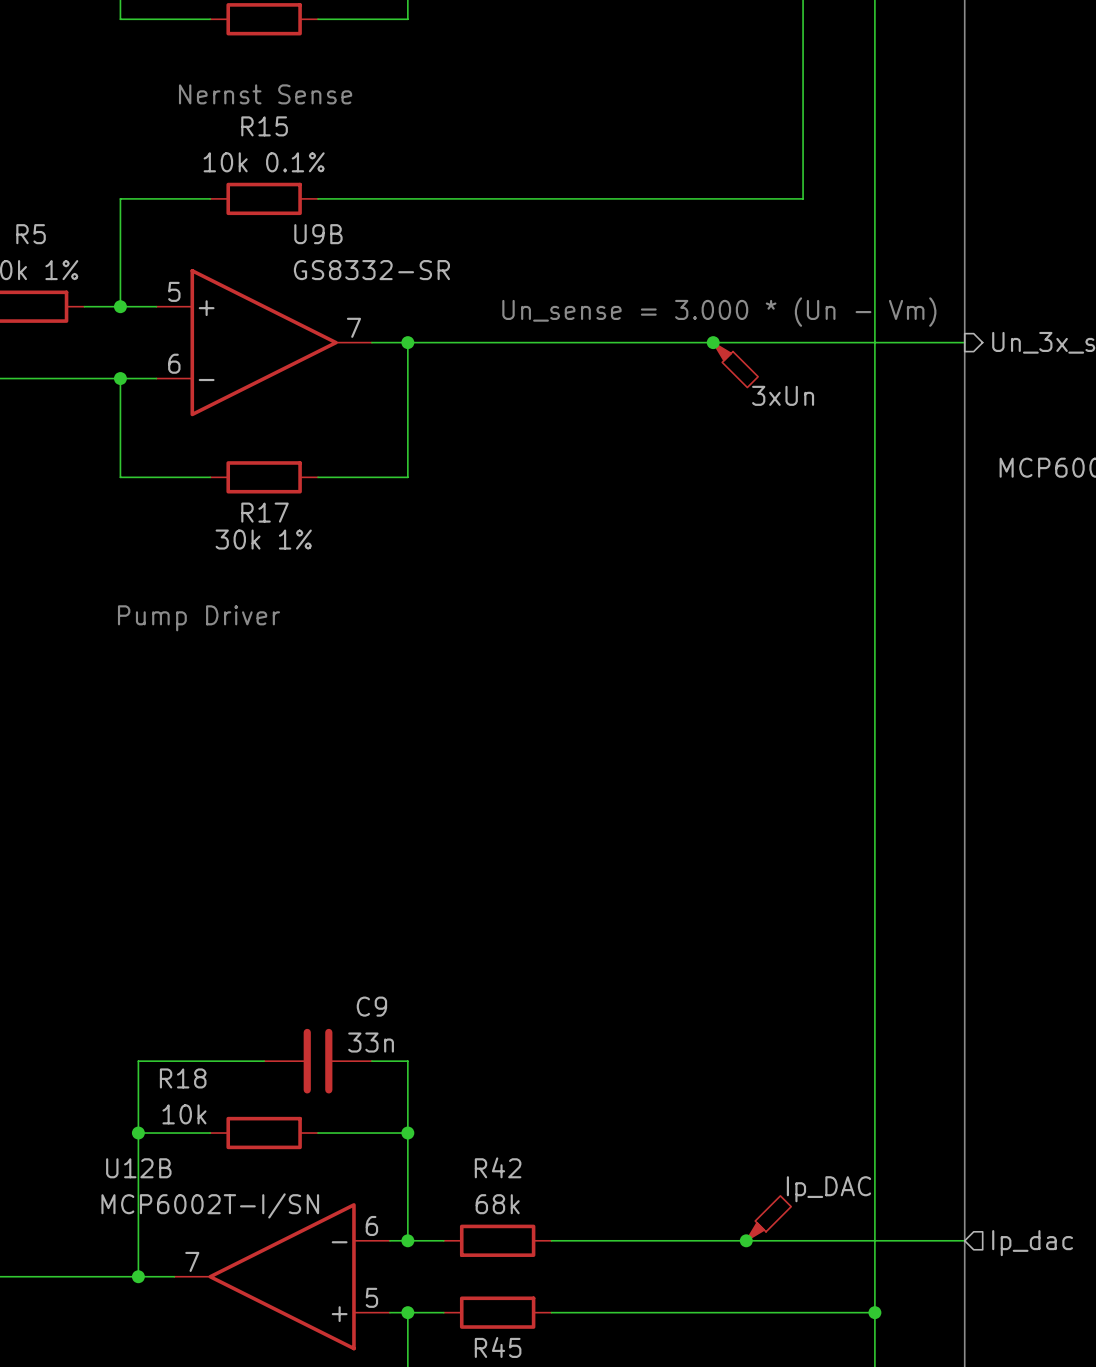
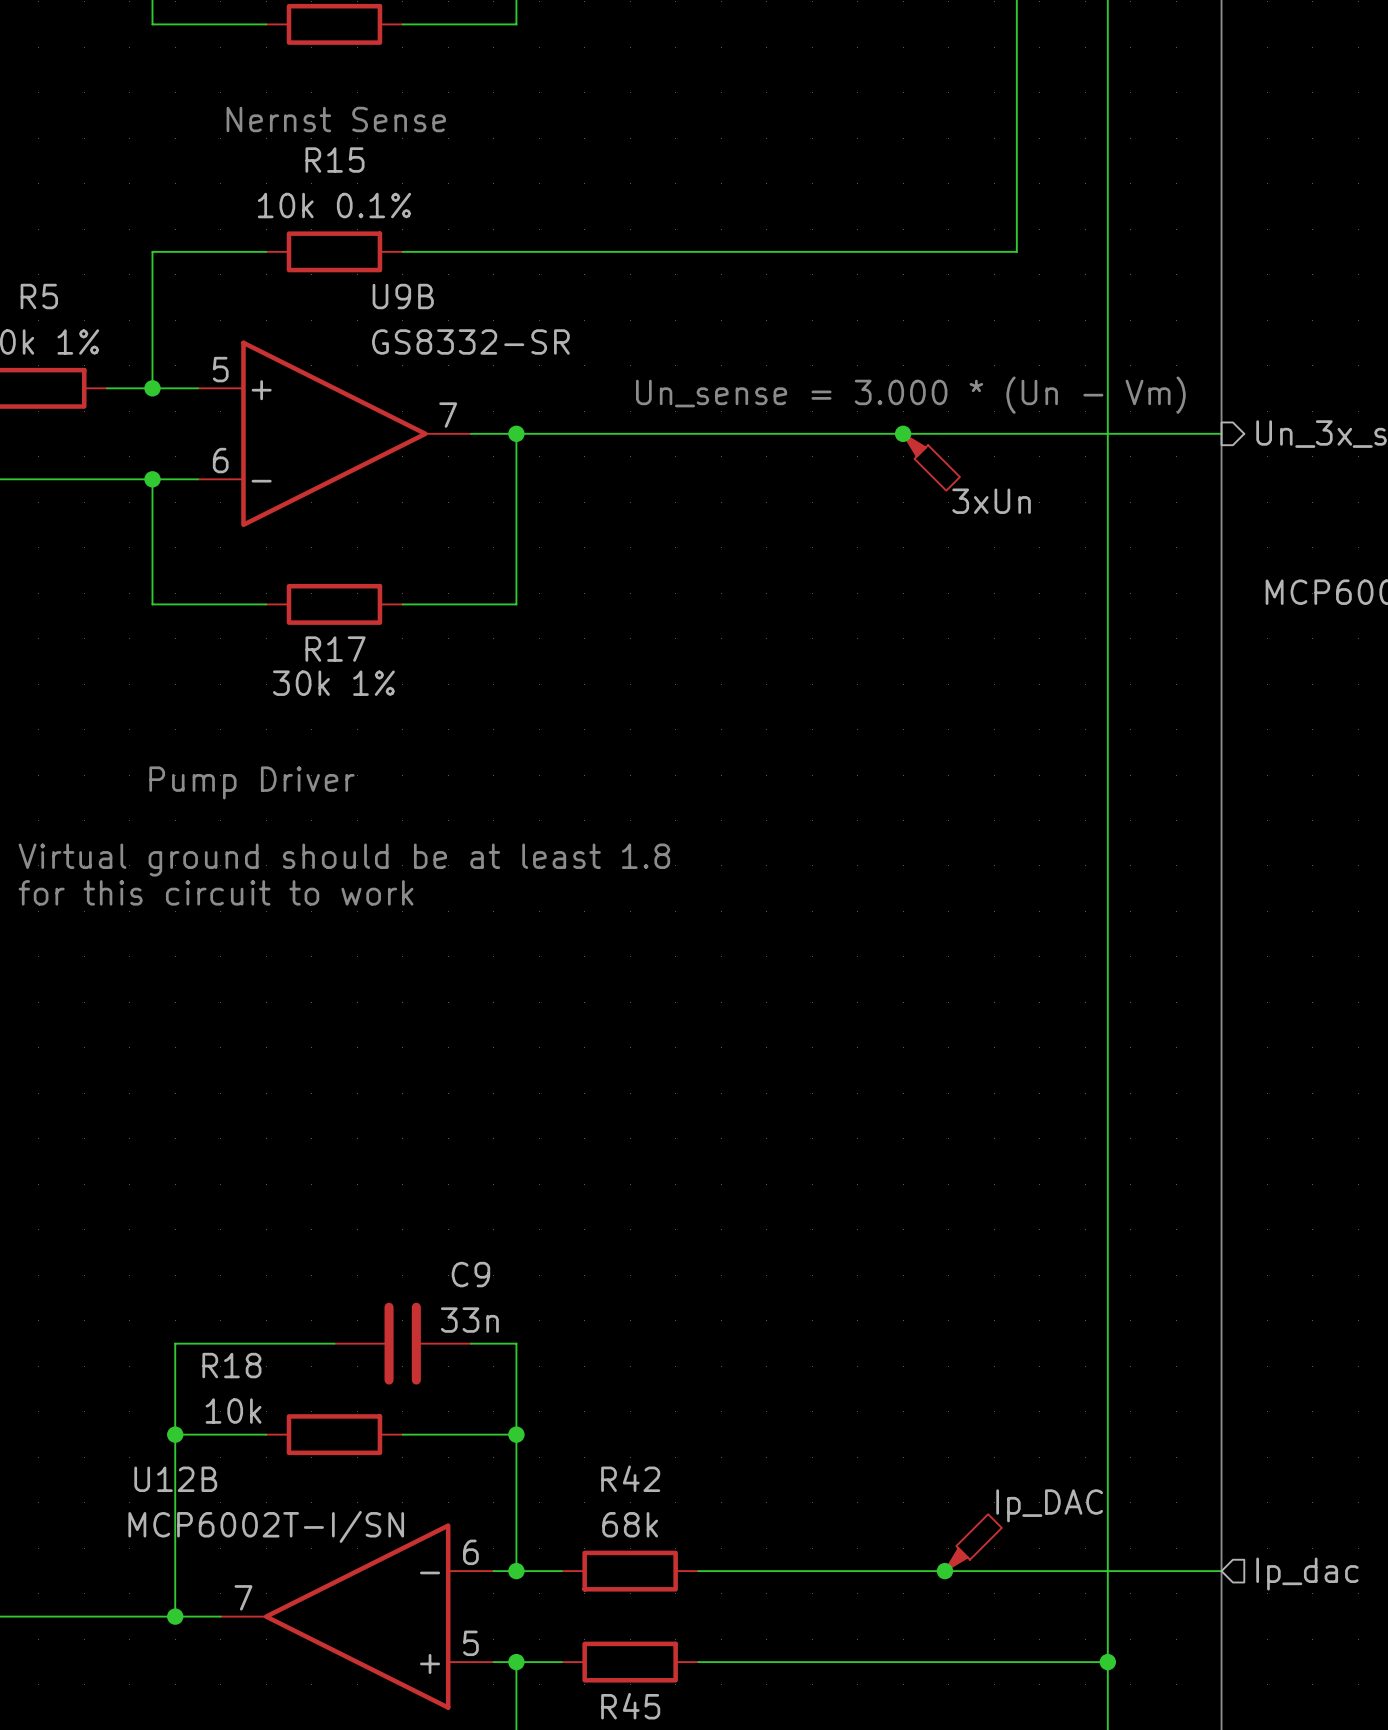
text: none -> Virtual ground should be at least 1.8 (344, 860)
text: none -> for this circuit to work (216, 892)

